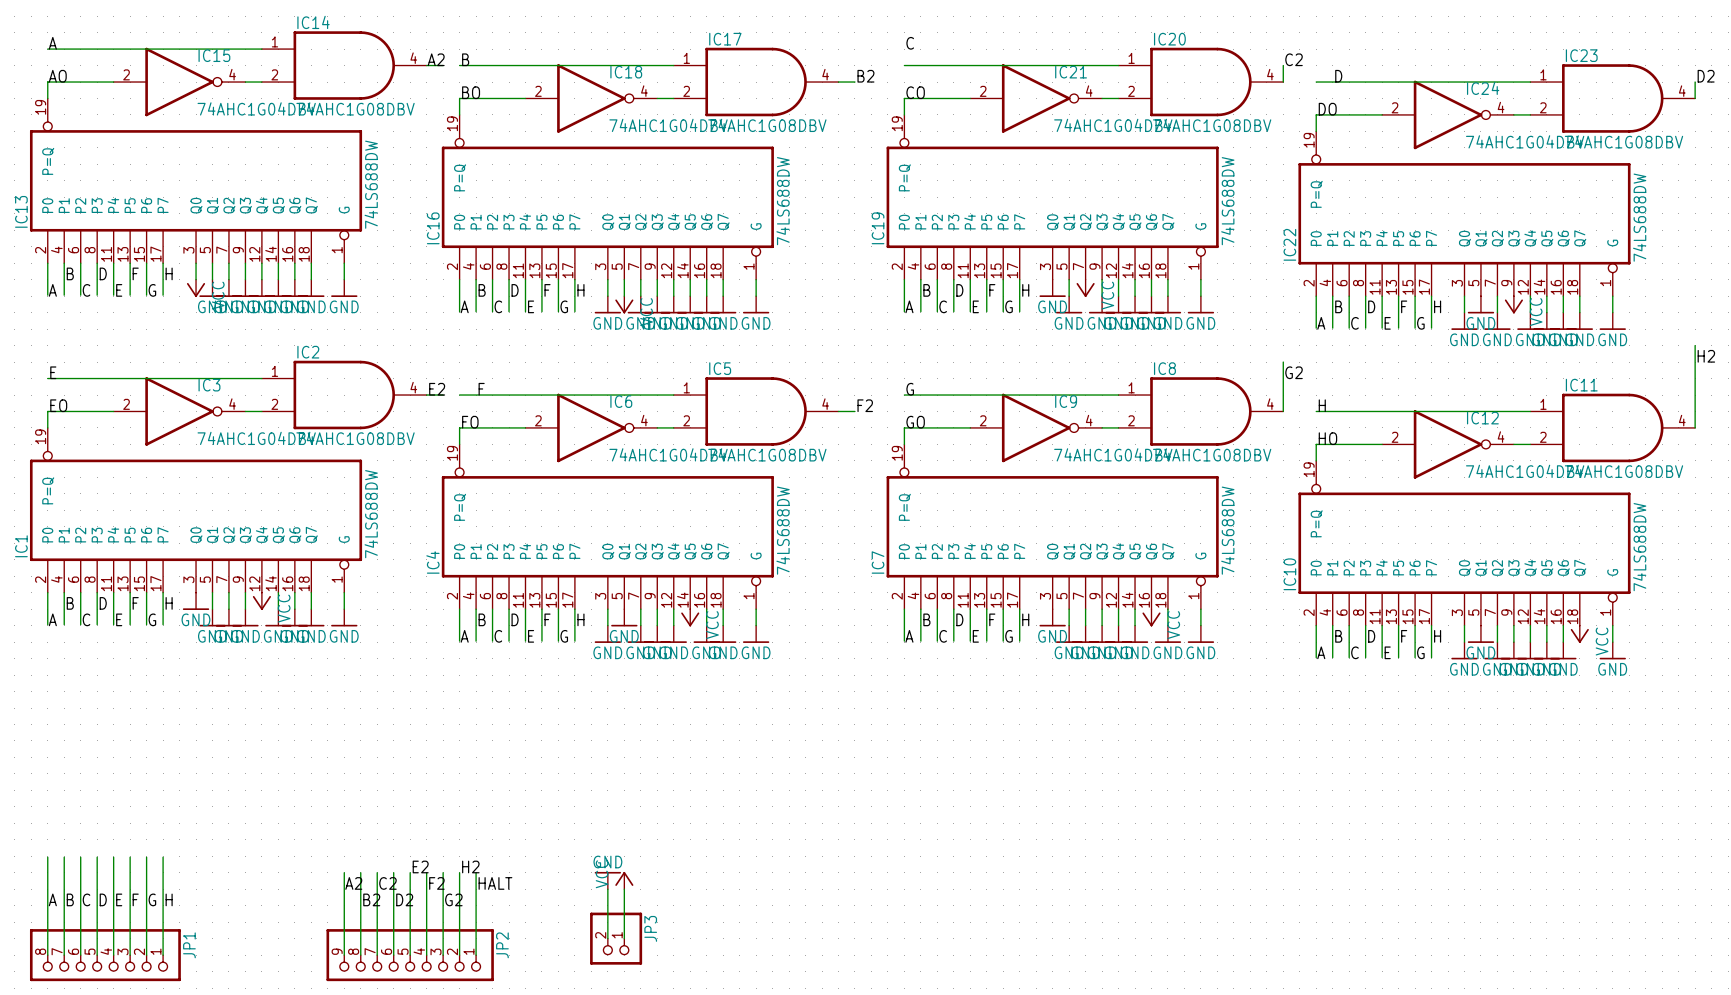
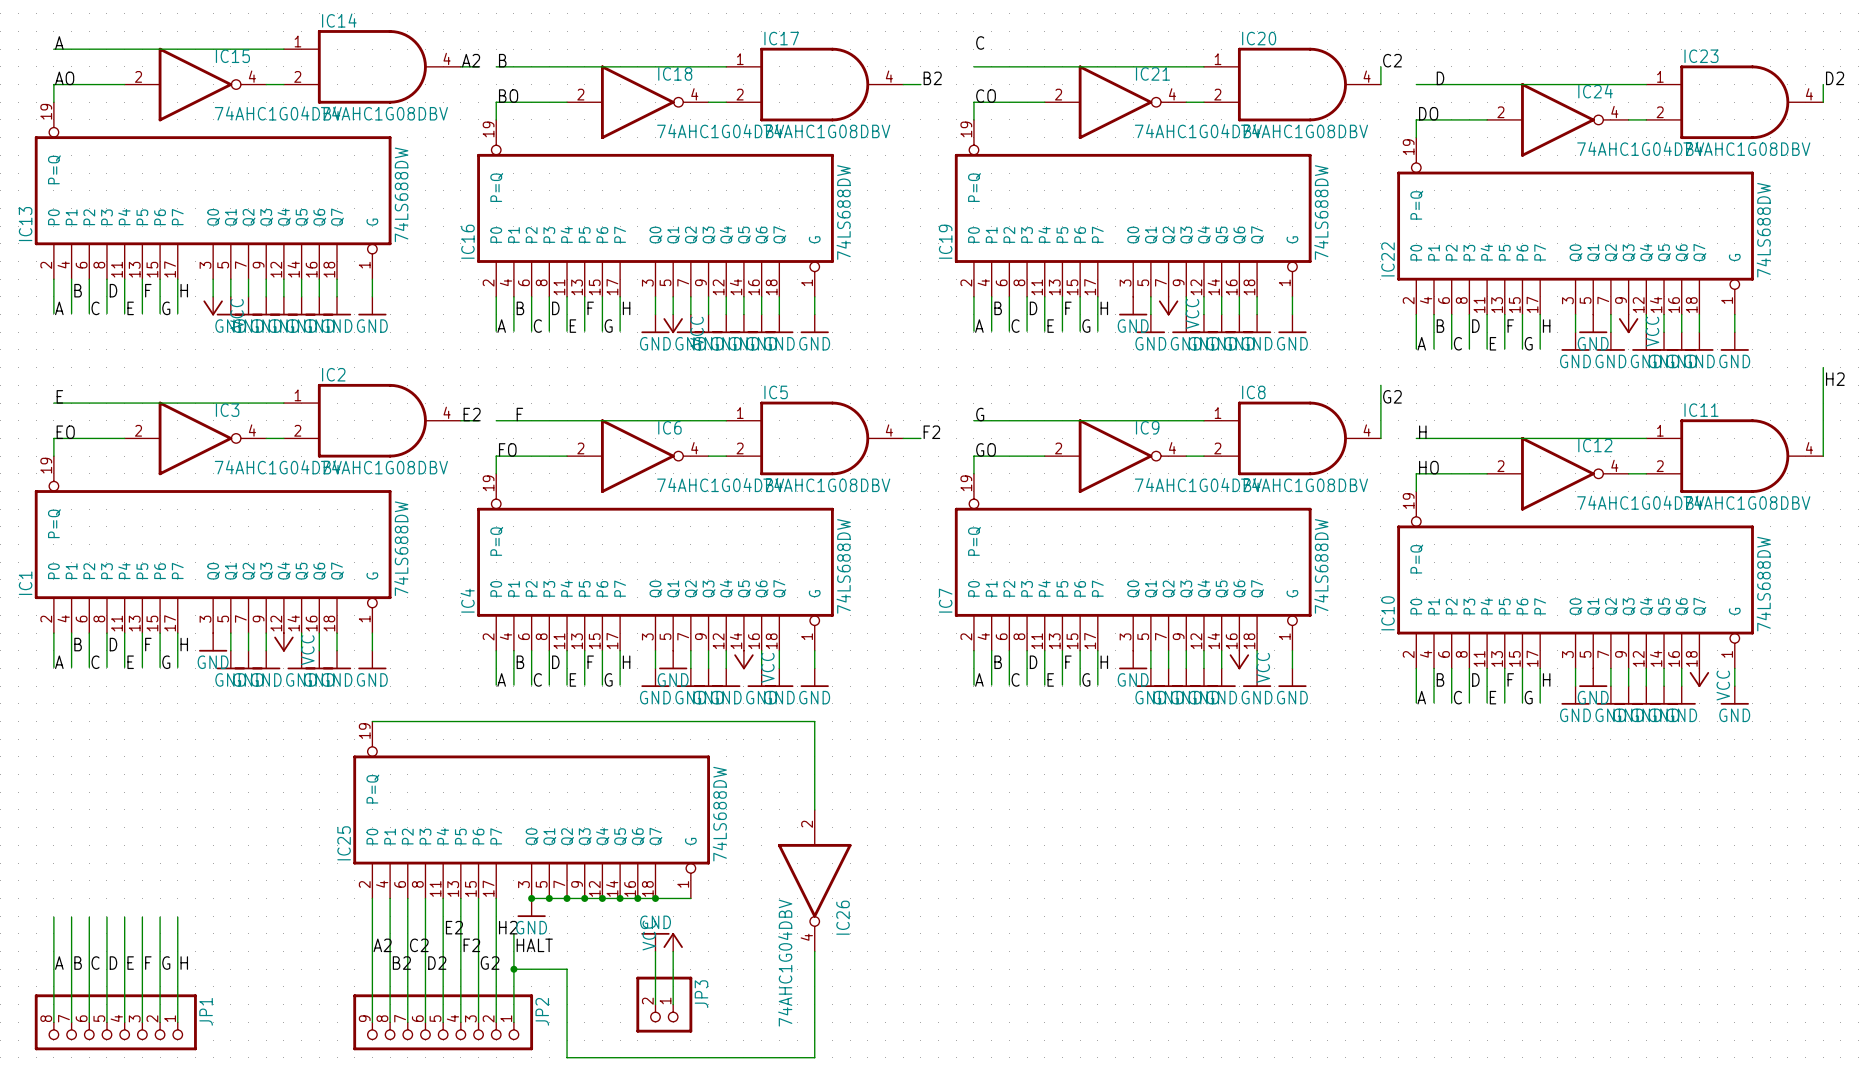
wire: none -> (372, 721) (814, 721) (814, 809)
IC25: none -> 74LS688DW (531, 809)
IC26: none -> 74AHC1G04DBV (814, 880)
wire: none -> (372, 898) (372, 933)
wire: none -> (390, 898) (390, 933)
wire: none -> (407, 898) (407, 933)
wire: none -> (425, 898) (425, 933)
wire: none -> (443, 898) (443, 933)
wire: none -> (460, 898) (460, 933)
wire: none -> (478, 898) (478, 933)
wire: none -> (496, 898) (496, 933)
wire: none -> (531, 898) (690, 898)
junction: none -> (531, 898)
junction: none -> (549, 898)
junction: none -> (567, 898)
junction: none -> (584, 898)
junction: none -> (602, 898)
junction: none -> (620, 898)
junction: none -> (637, 898)
junction: none -> (655, 898)
power symbol: none -> GND (531, 907)
wire: none -> (814, 951) (814, 1057) (567, 1057) (567, 969) (513, 969)
junction: none -> (513, 969)

